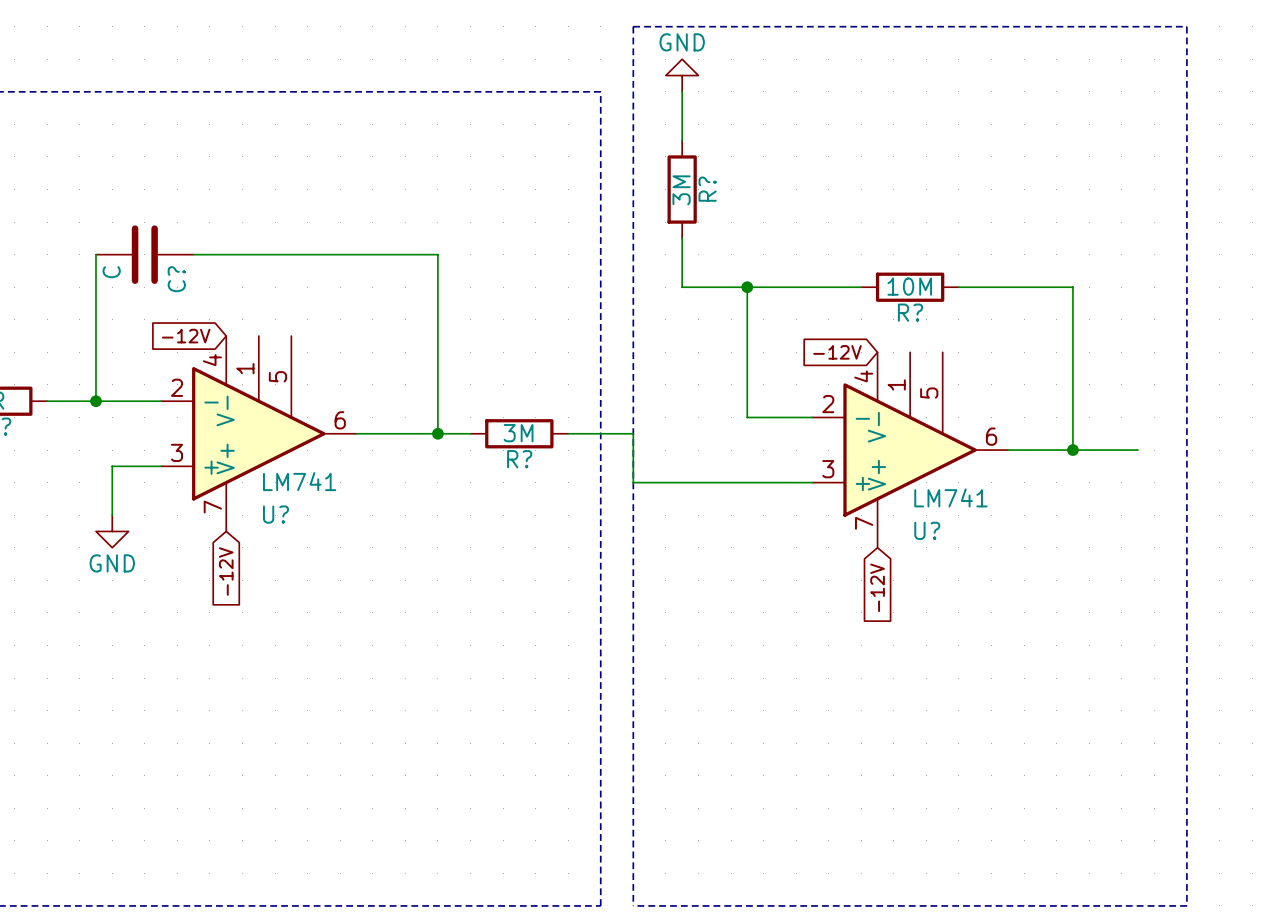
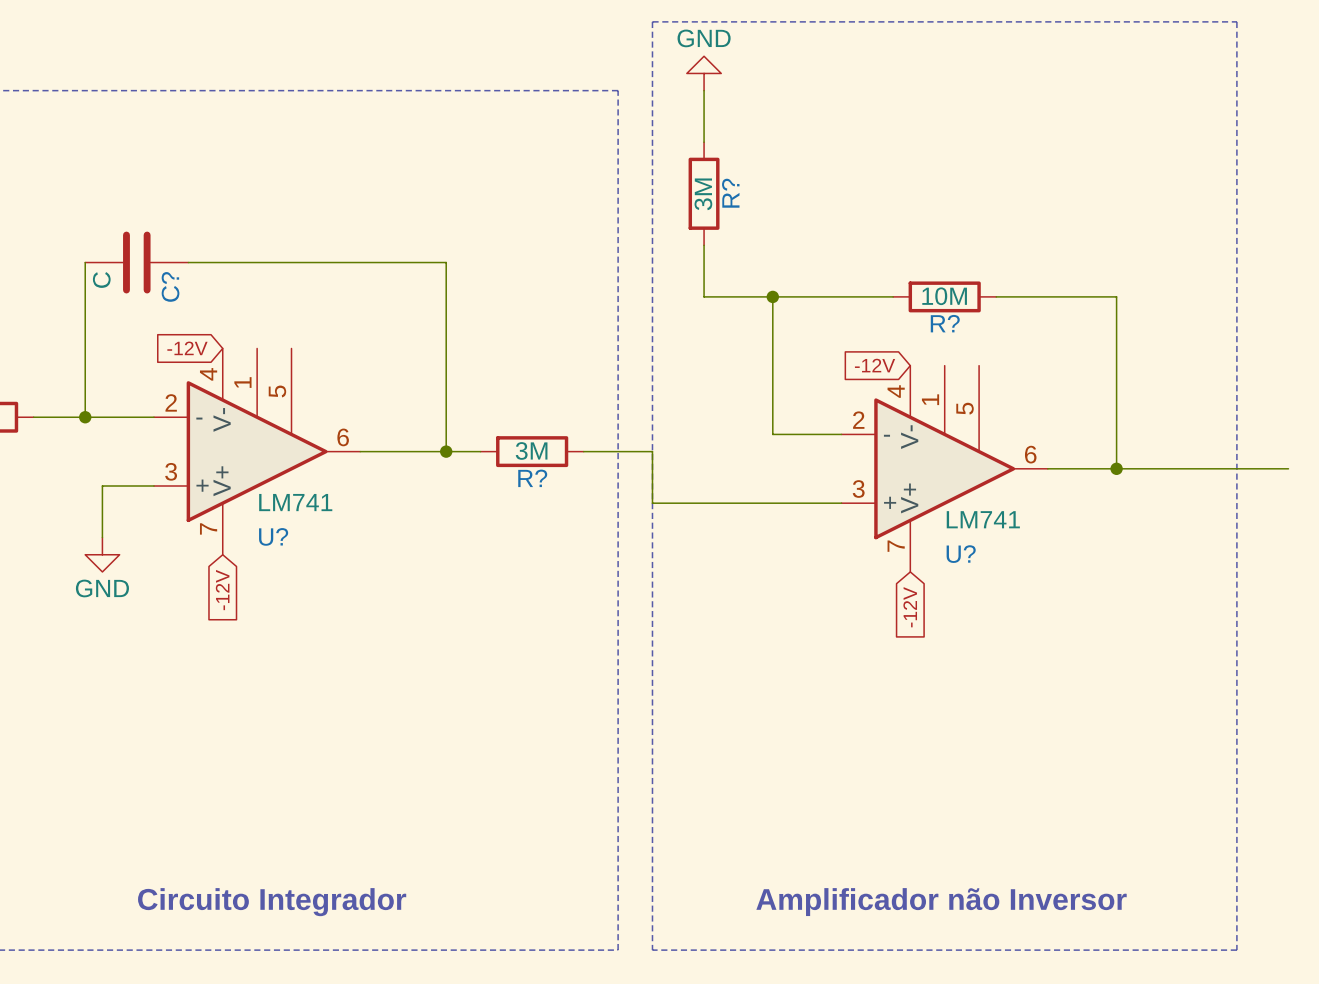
wire: none -> (1185, 468) (1288, 468)
text: none -> Circuito Integrador (272, 902)
text: none -> Amplificador não Inversor (941, 902)

